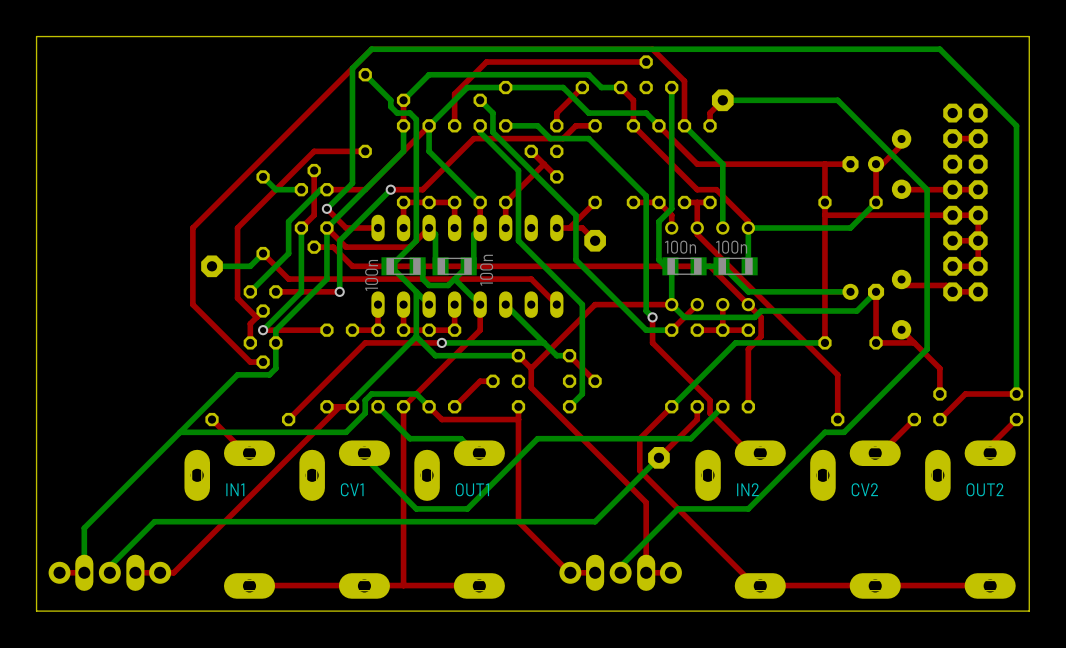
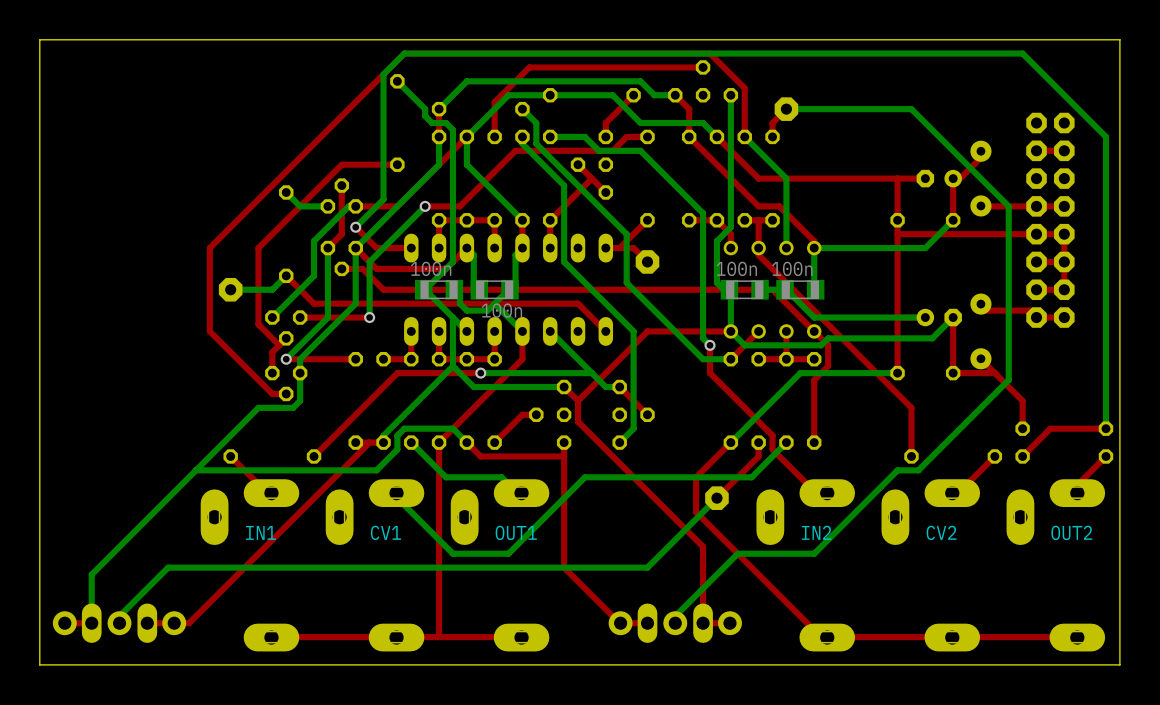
part value rotation: 0° (486, 270) -> 90° clockwise (501, 310)
part value rotation: 0° (371, 275) -> 90° clockwise (431, 268)

